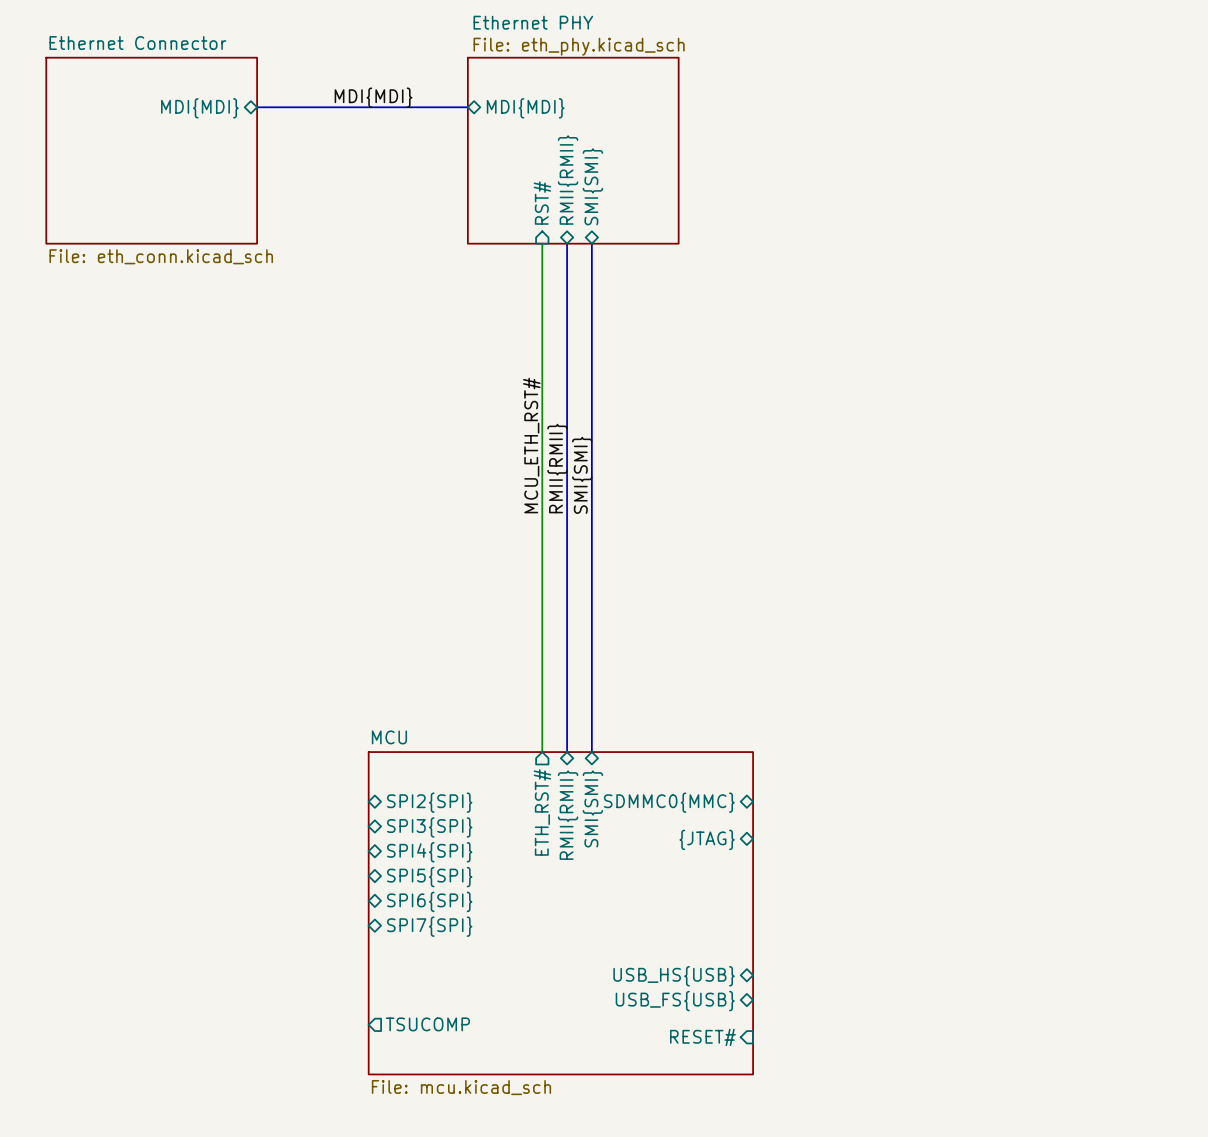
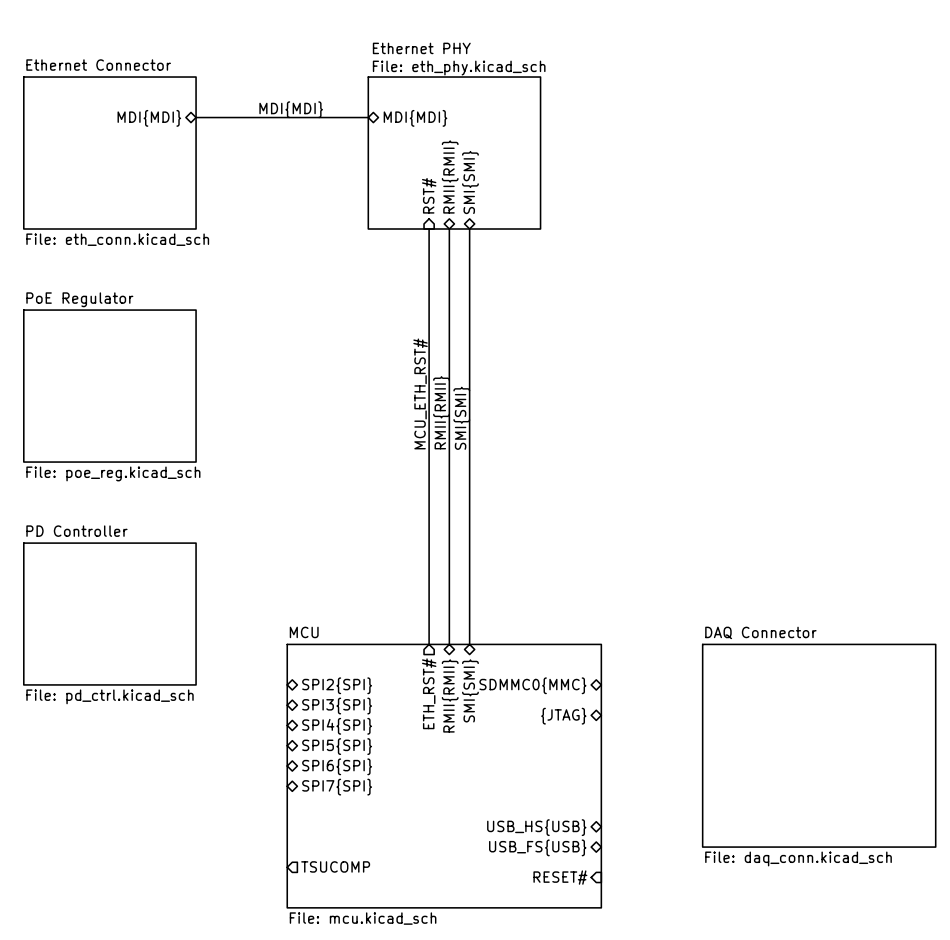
sheet PoE Regulator: none -> File: poe_reg.kicad_sch (109, 386)
sheet PD Controller: none -> File: pd_ctrl.kicad_sch (109, 614)
sheet DAQ Connector: none -> File: daq_conn.kicad_sch (819, 745)

